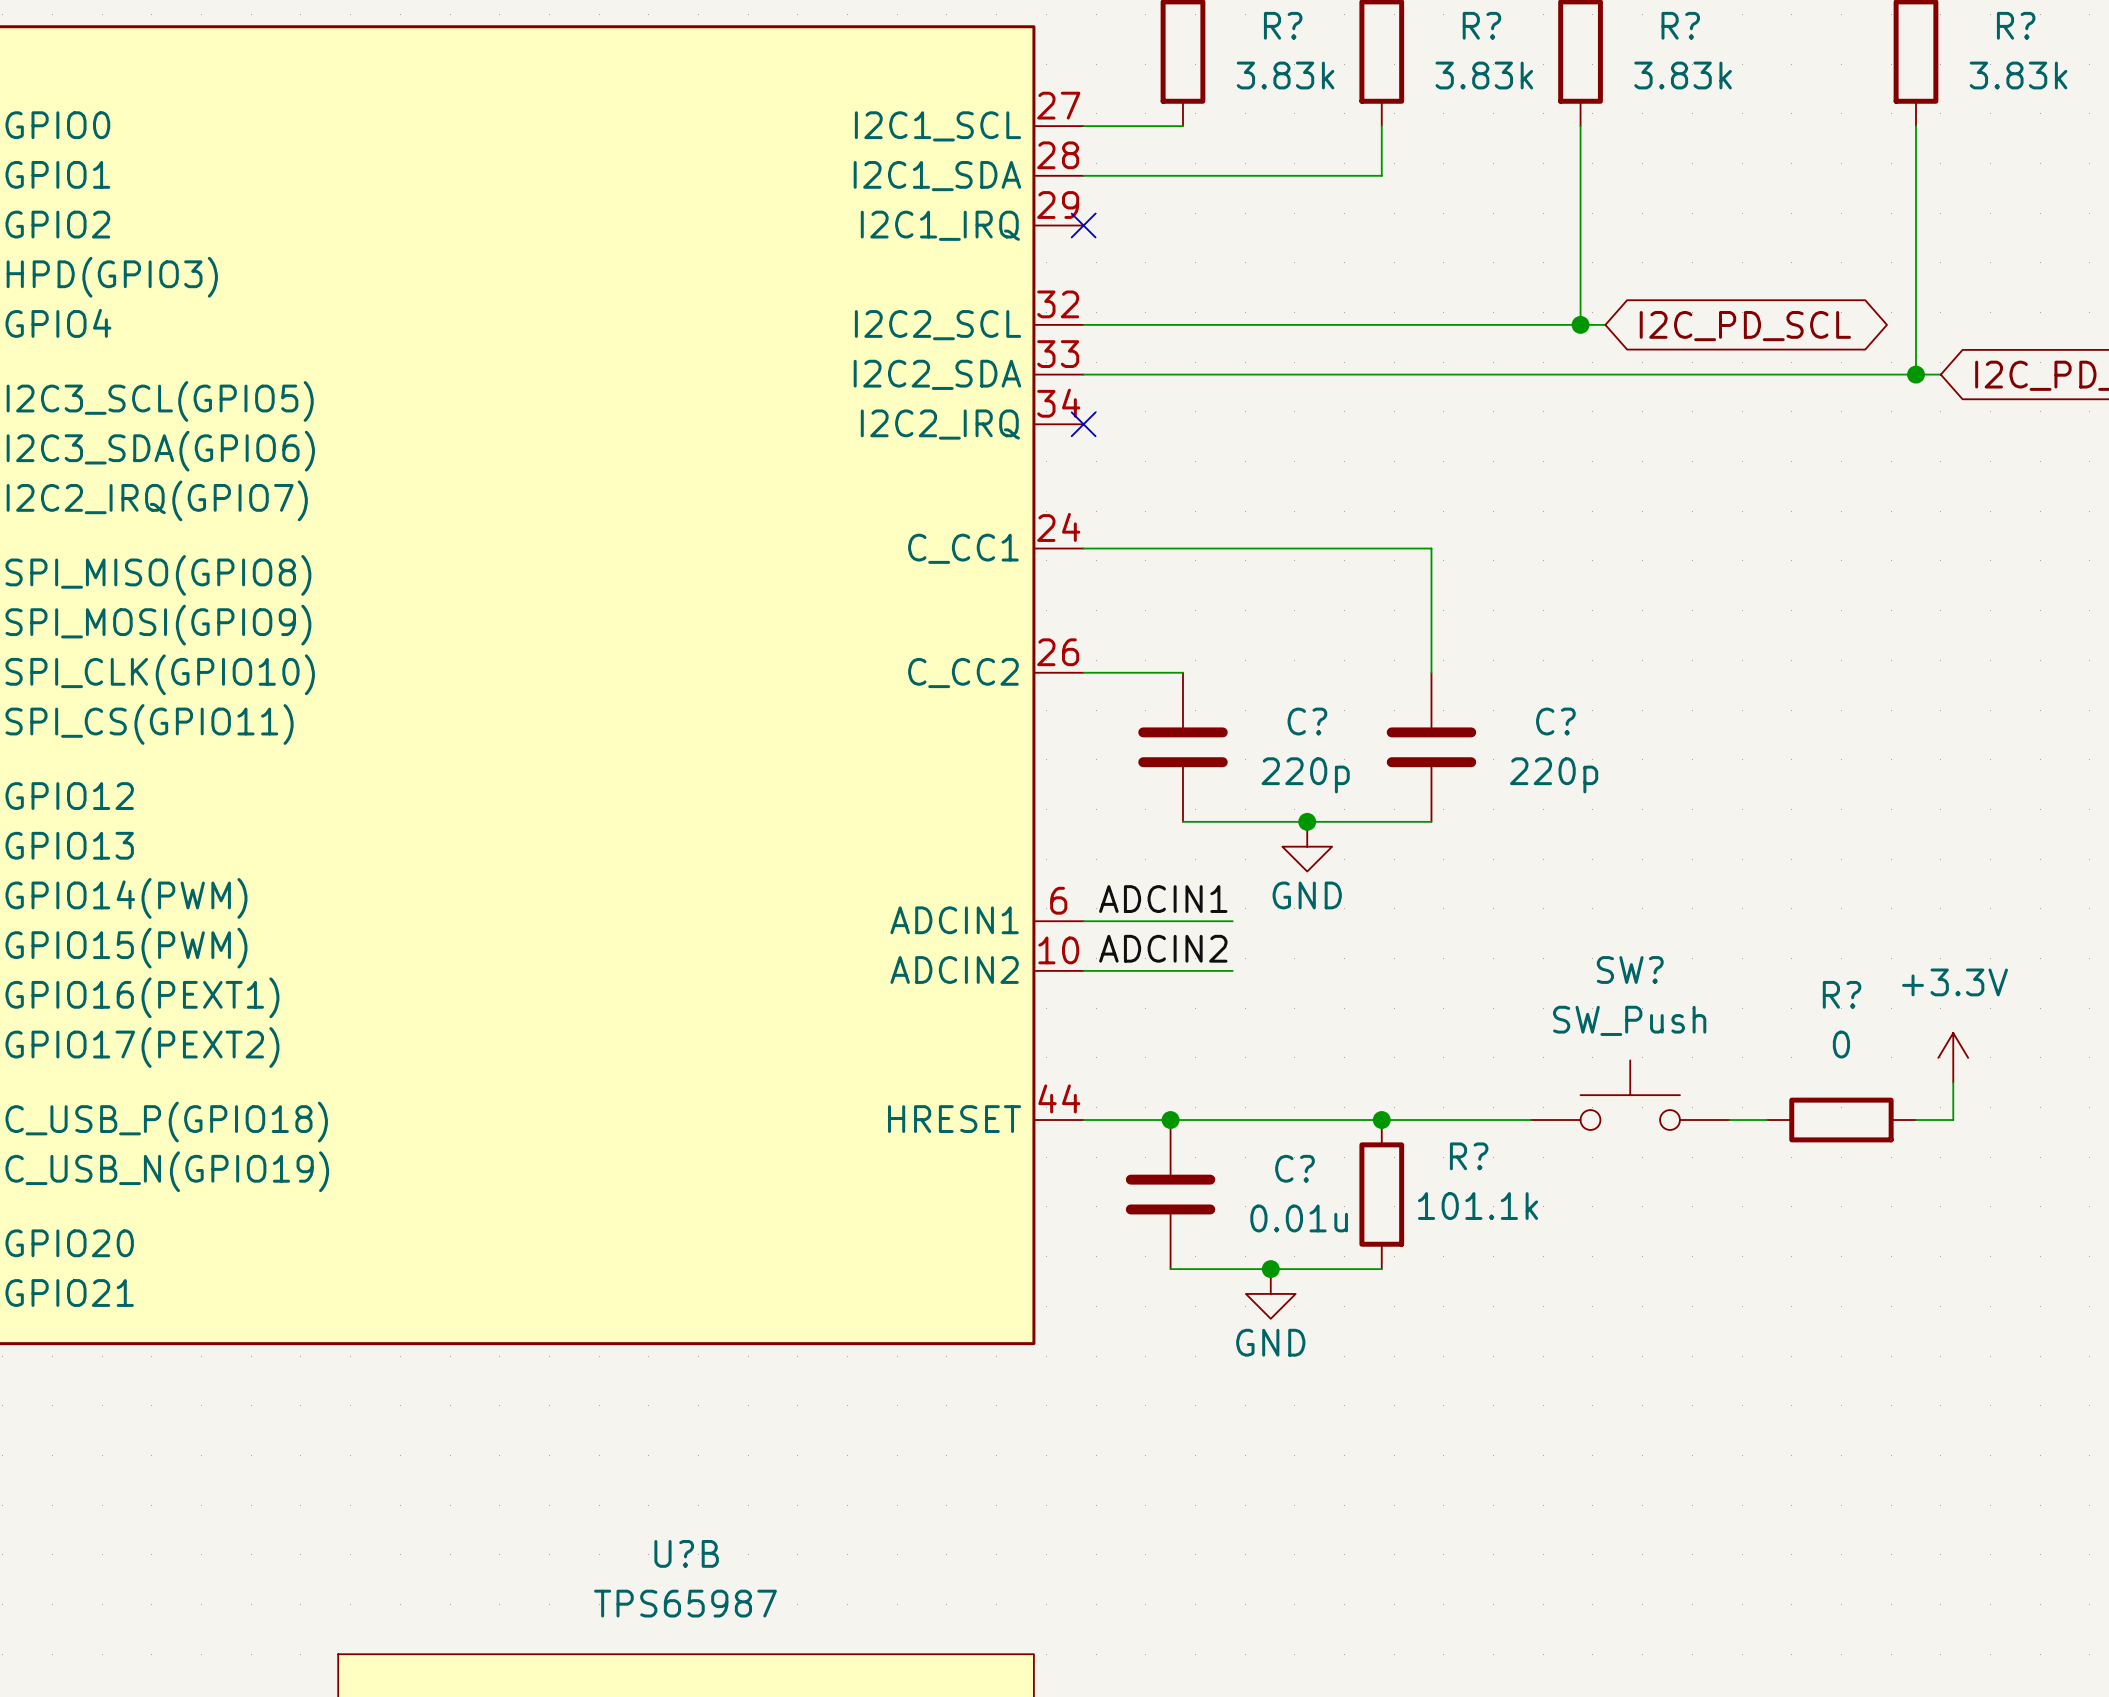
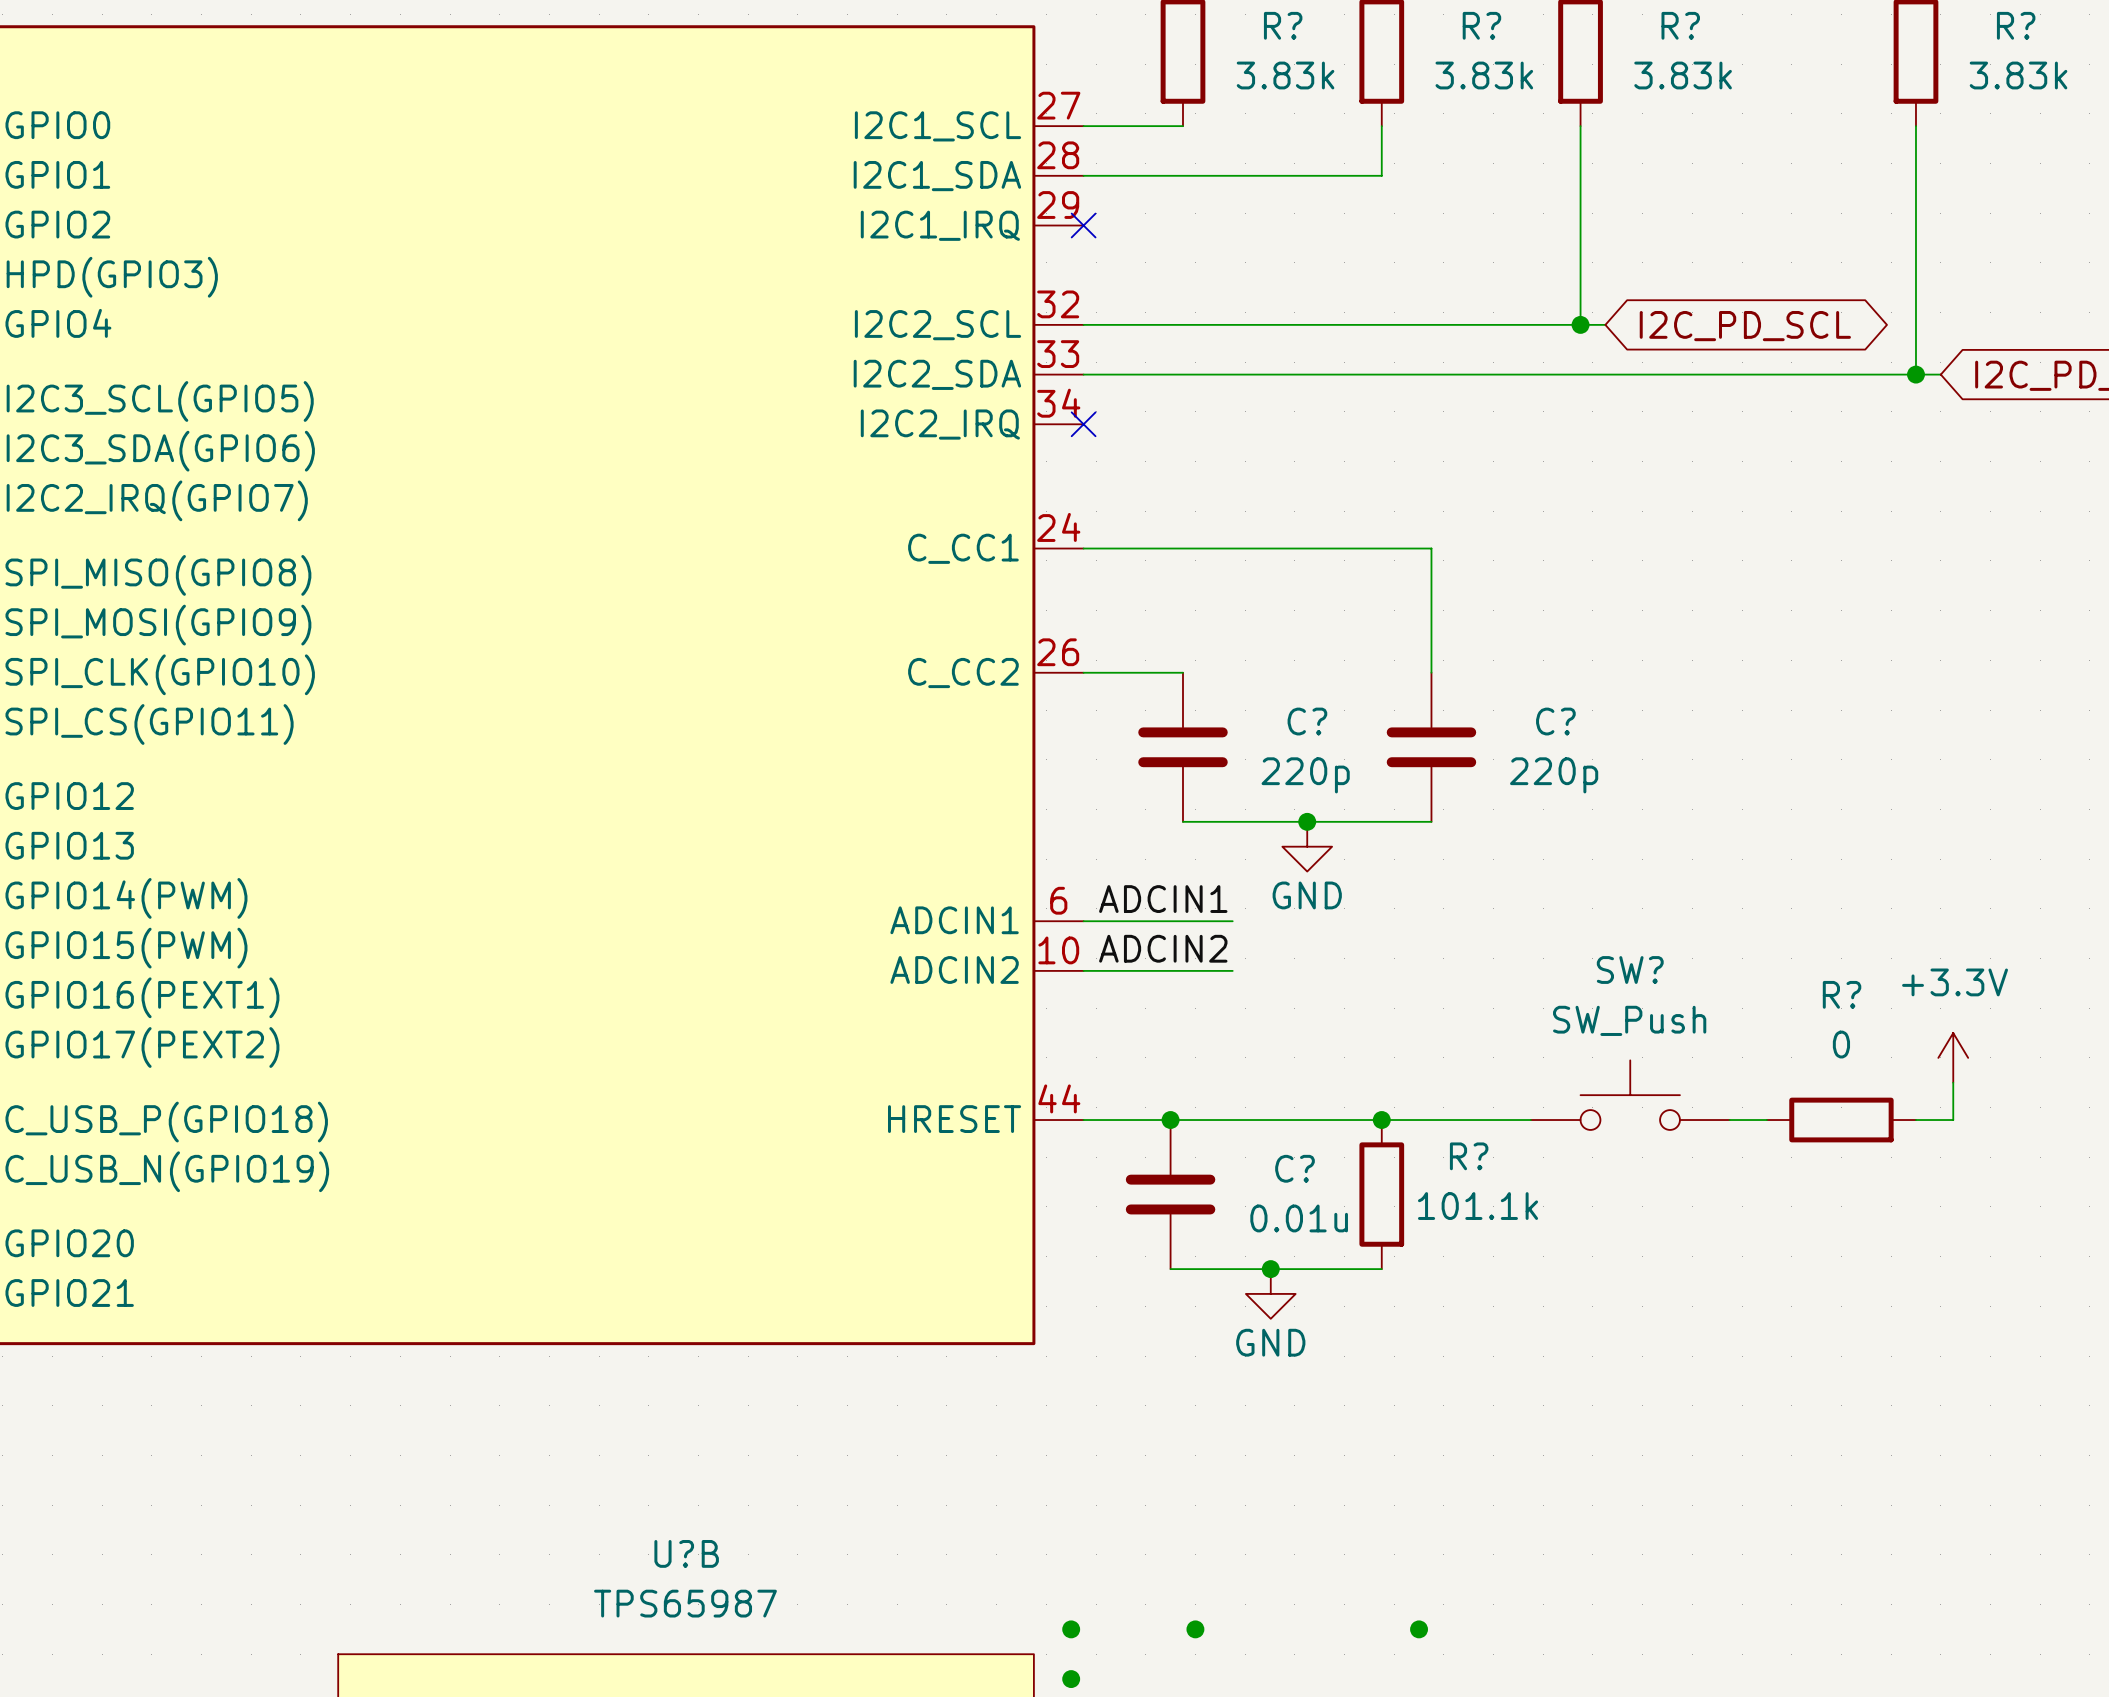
junction: none -> (1071, 1629)
junction: none -> (1195, 1629)
junction: none -> (1419, 1629)
junction: none -> (1071, 1679)

